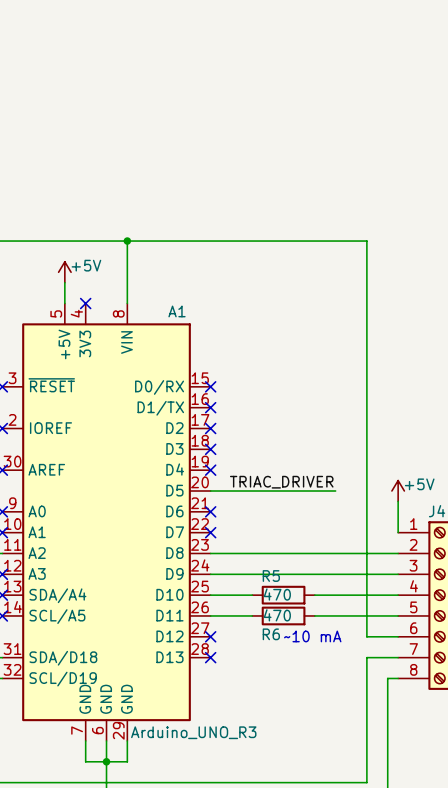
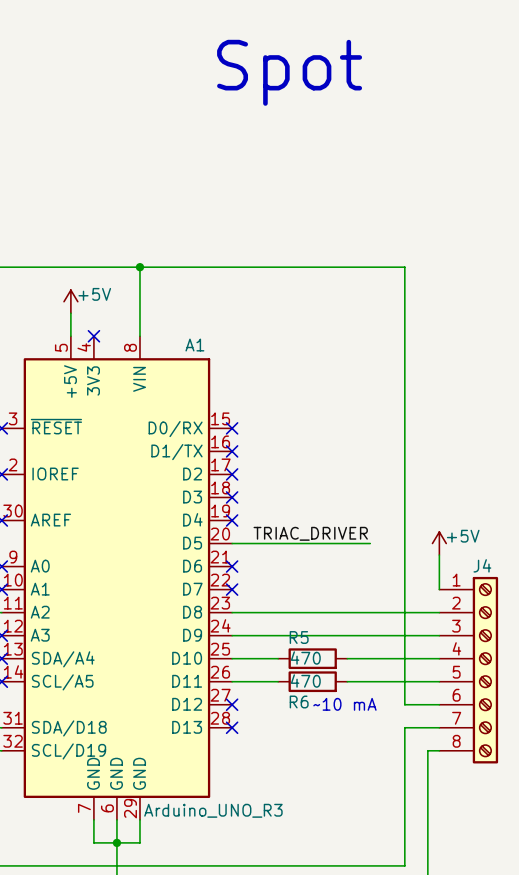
text: none -> Spot (289, 72)

